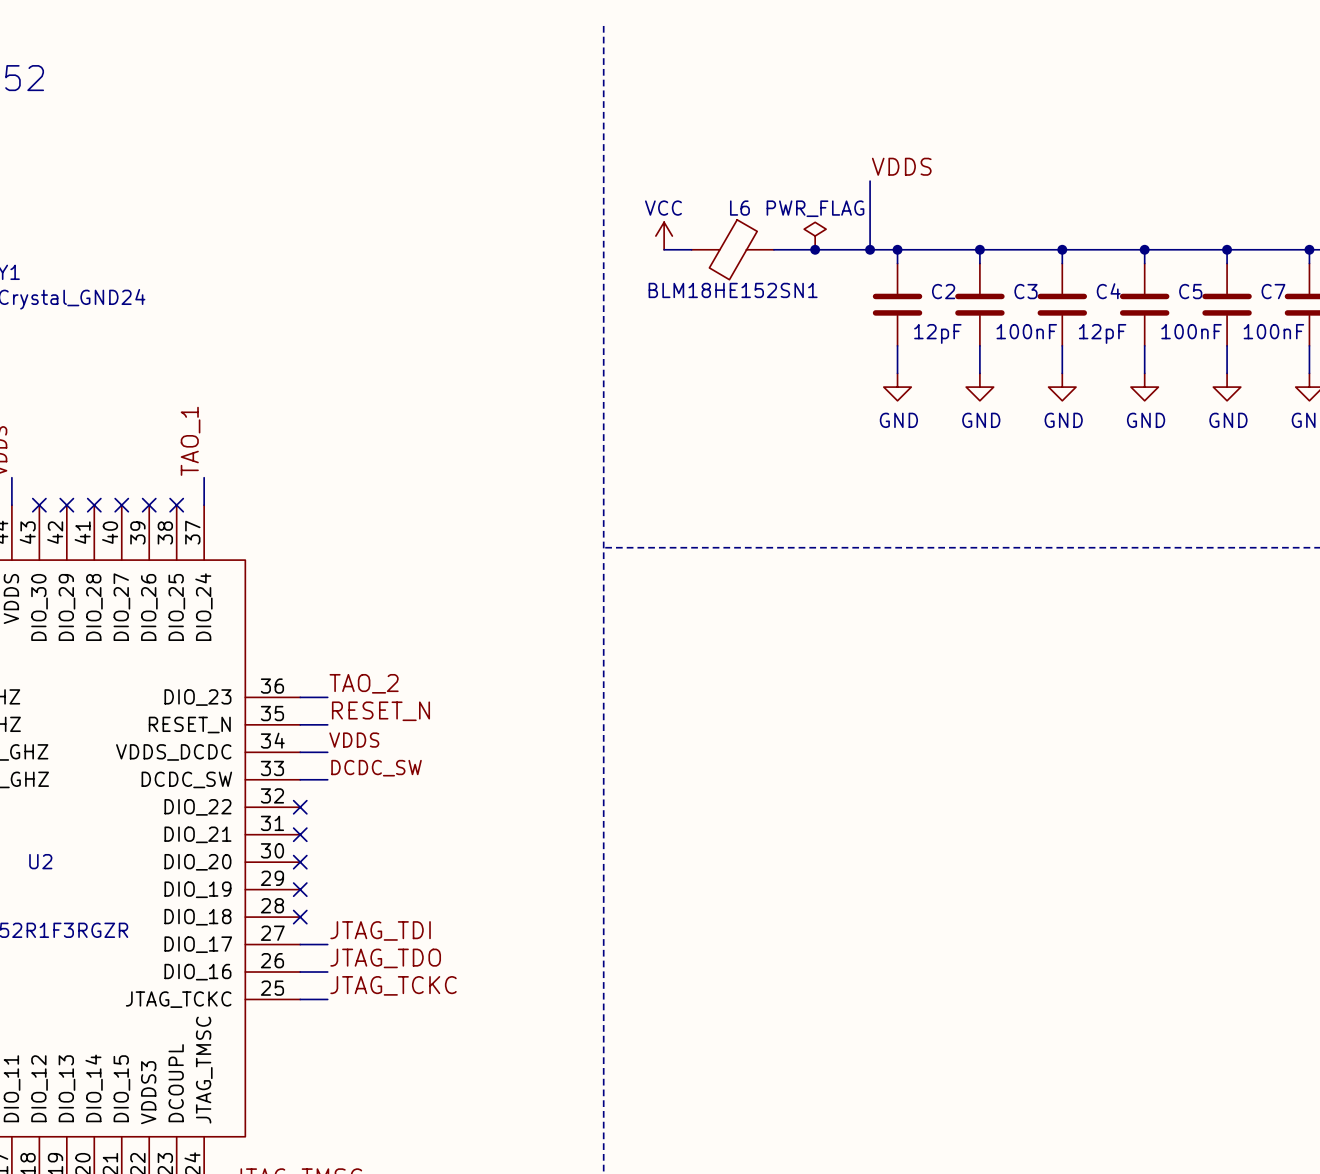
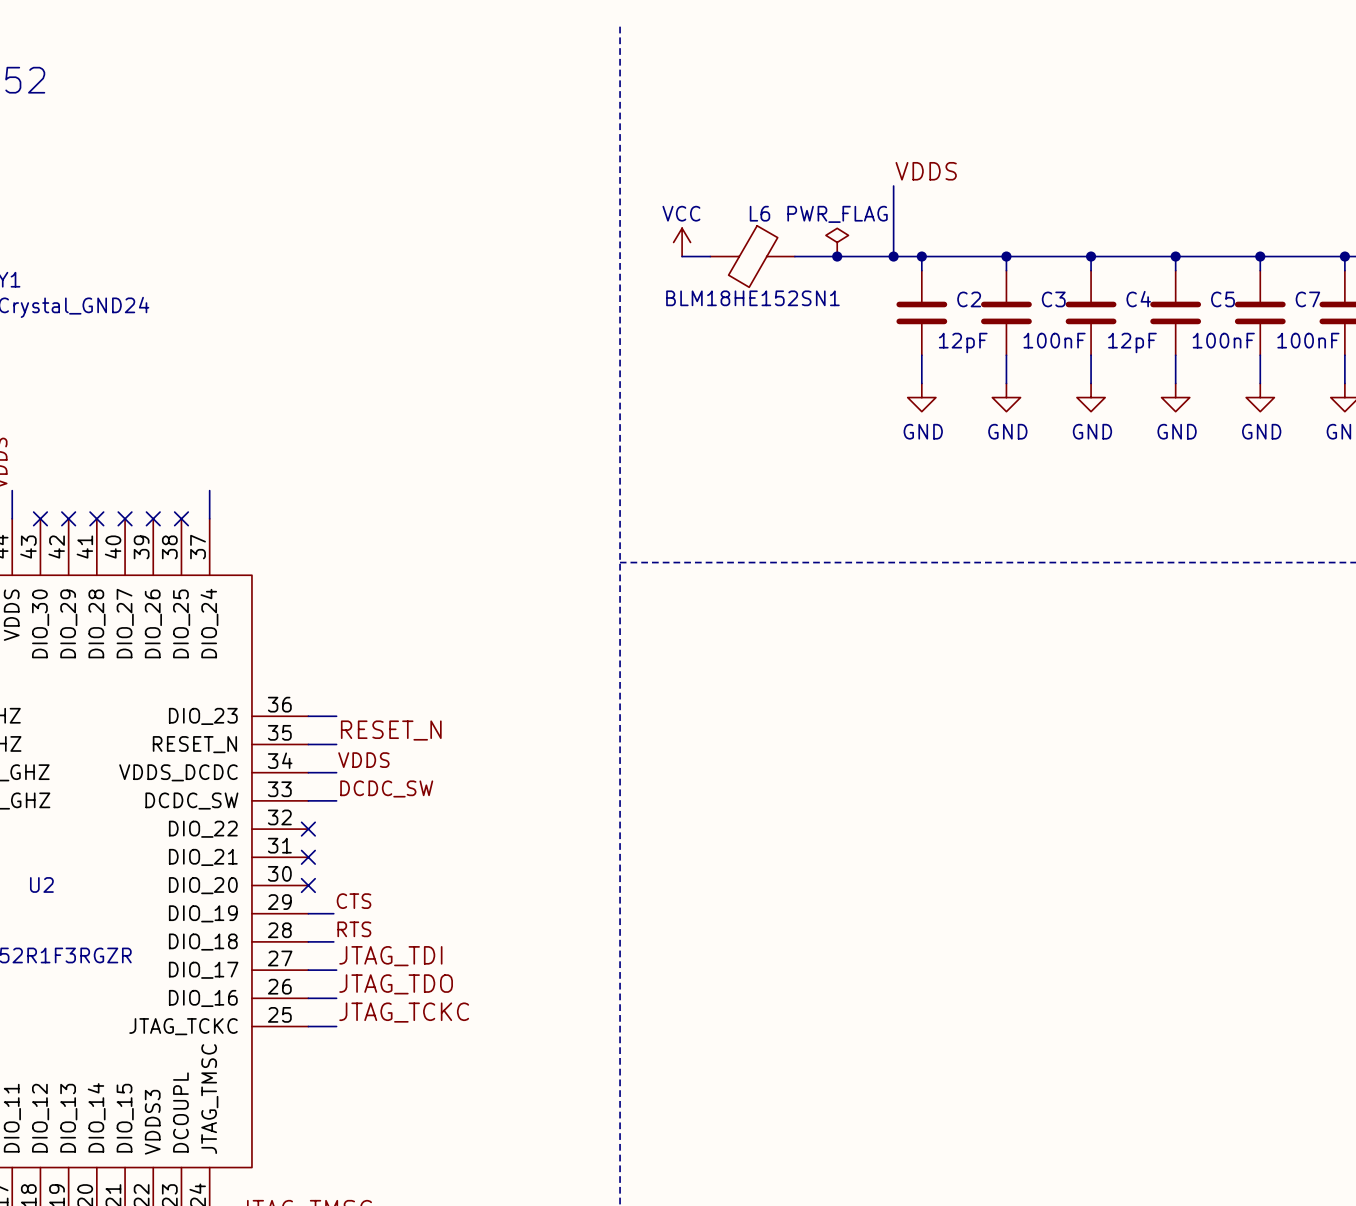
label: TAO_1 (190, 441) -> none
label: TAO_2 (364, 683) -> none
label: none -> CTS (354, 901)
wire: none -> (308, 913) (333, 913)
no-connect mark: (300, 889) -> none
label: none -> RTS (354, 929)
wire: none -> (308, 941) (333, 941)
no-connect mark: (300, 917) -> none

